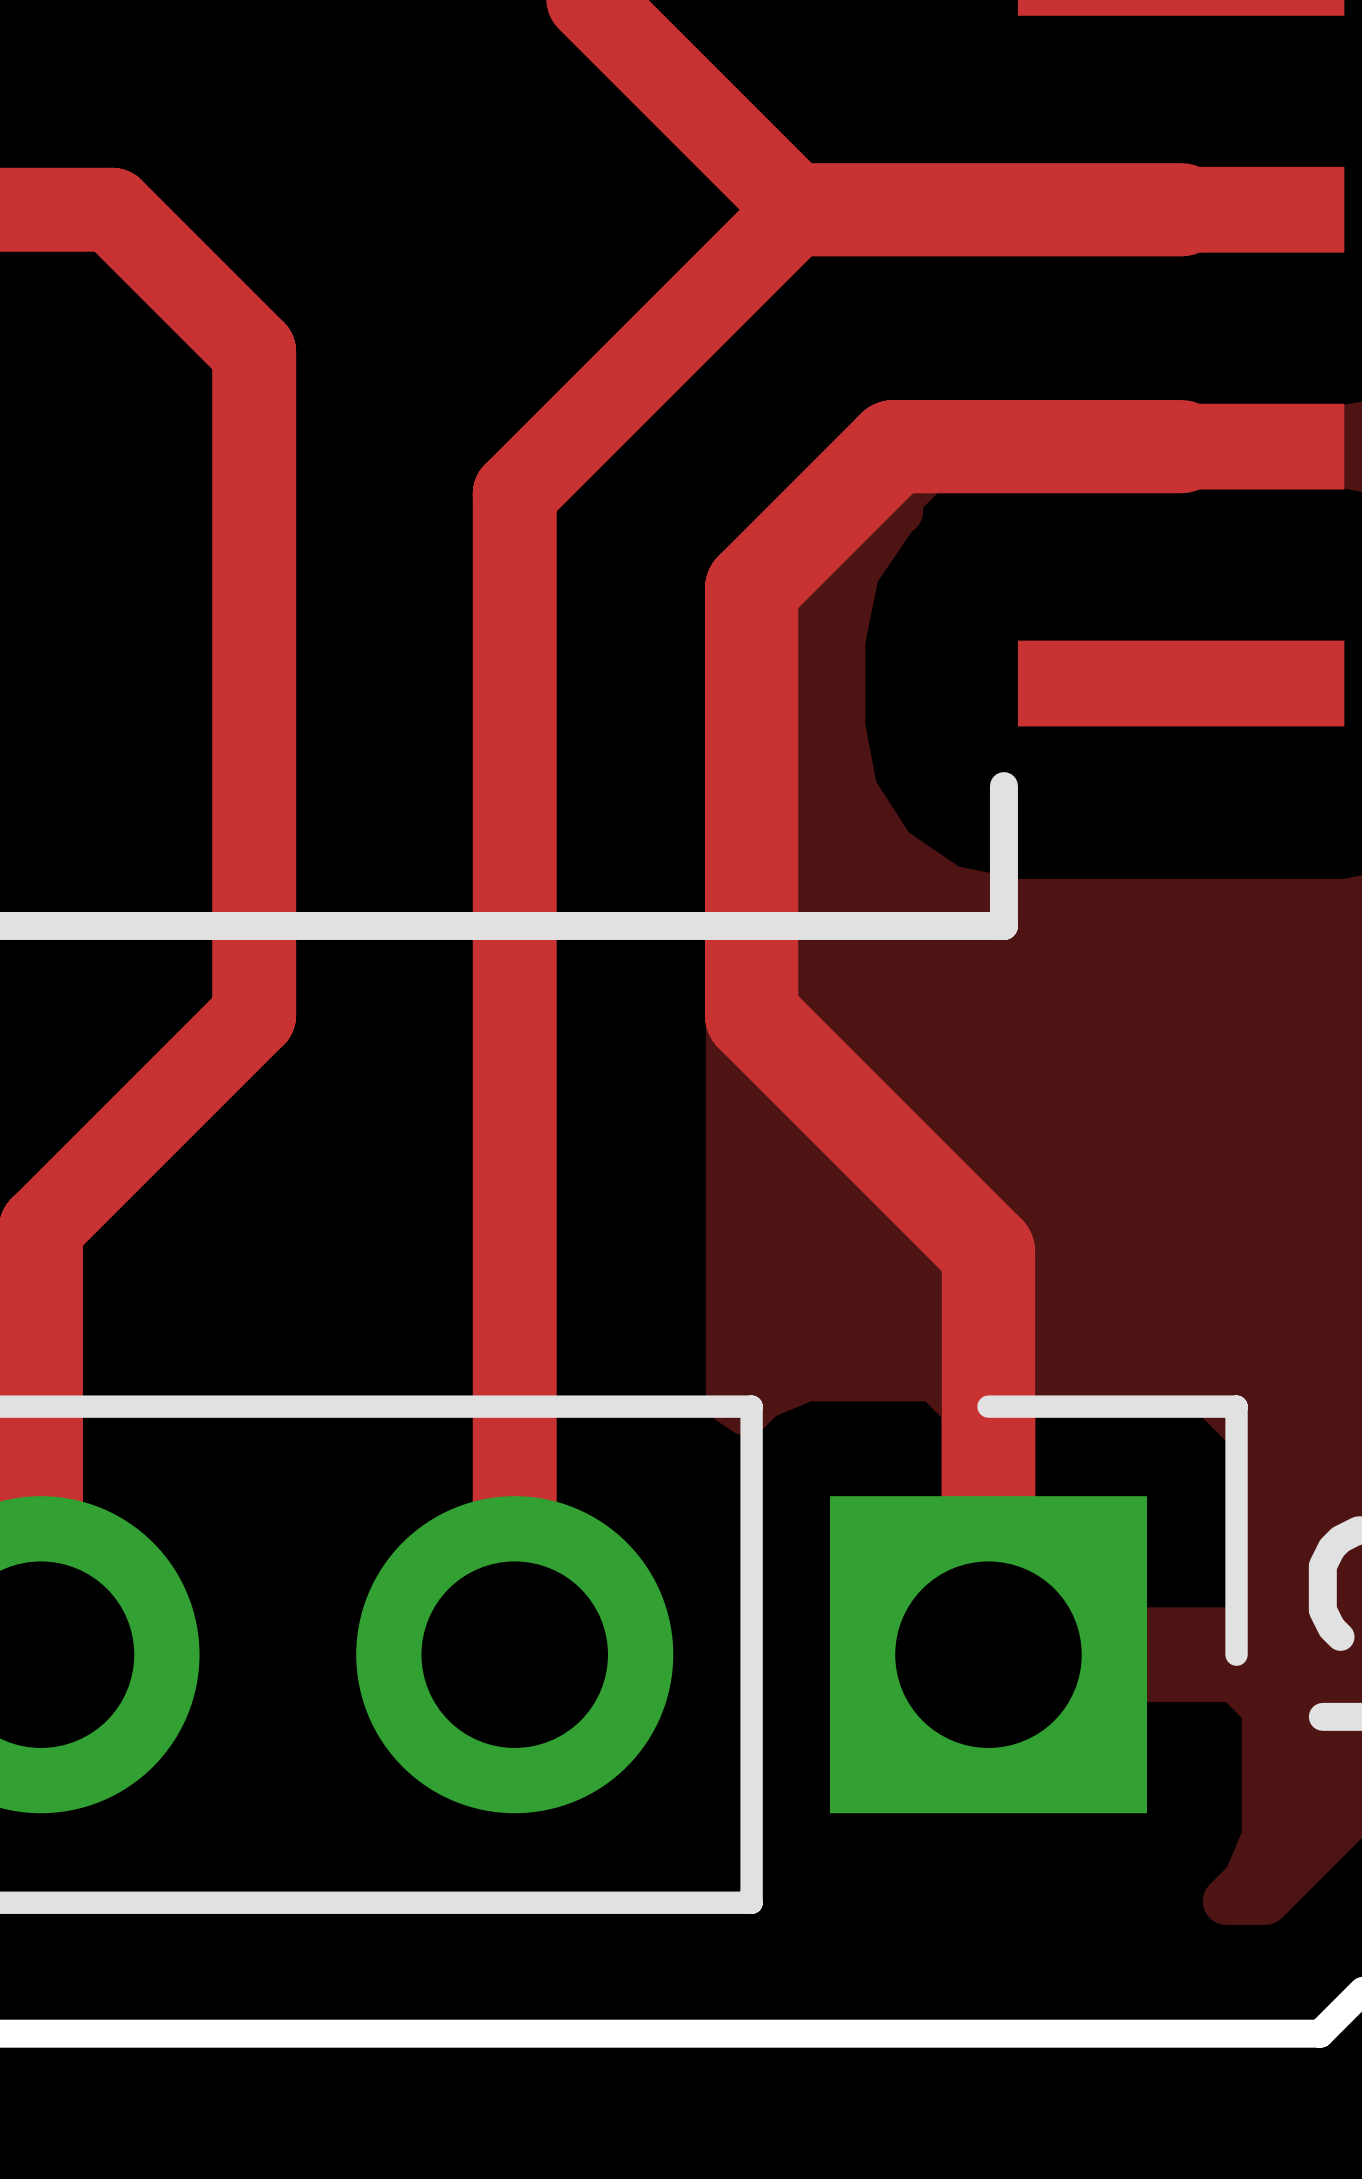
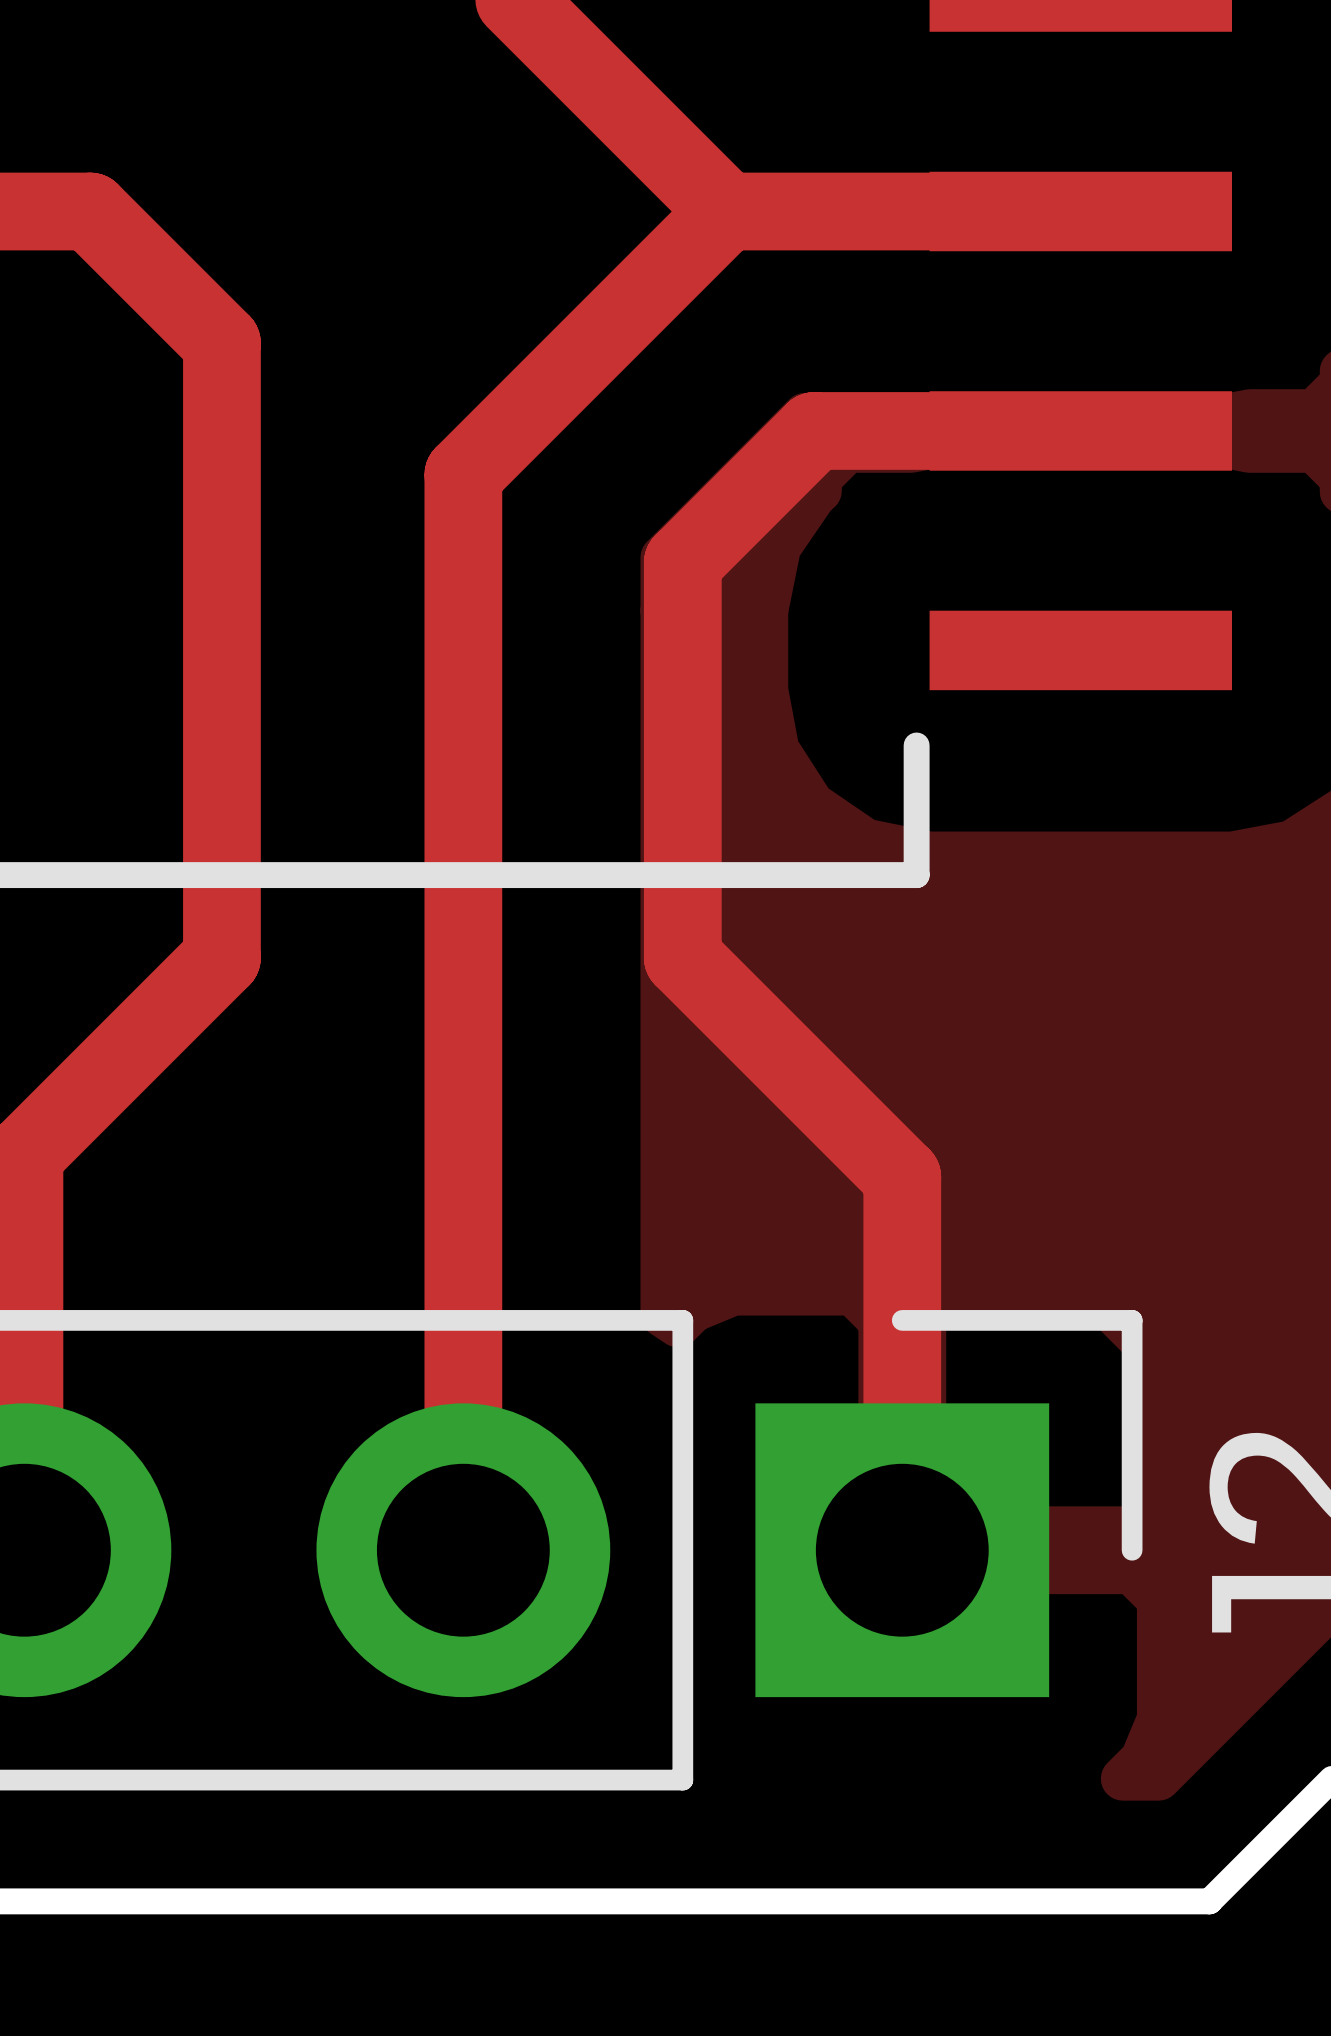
top track width: thick (798, 209) (1181, 209) -> thin (726, 211) (1080, 211)
top track width: thick (1181, 446) (893, 446) (751, 588) (751, 1015) (988, 1252) (988, 1654) -> thin (1080, 430) (814, 430) (682, 562) (682, 957) (902, 1177) (902, 1550)

